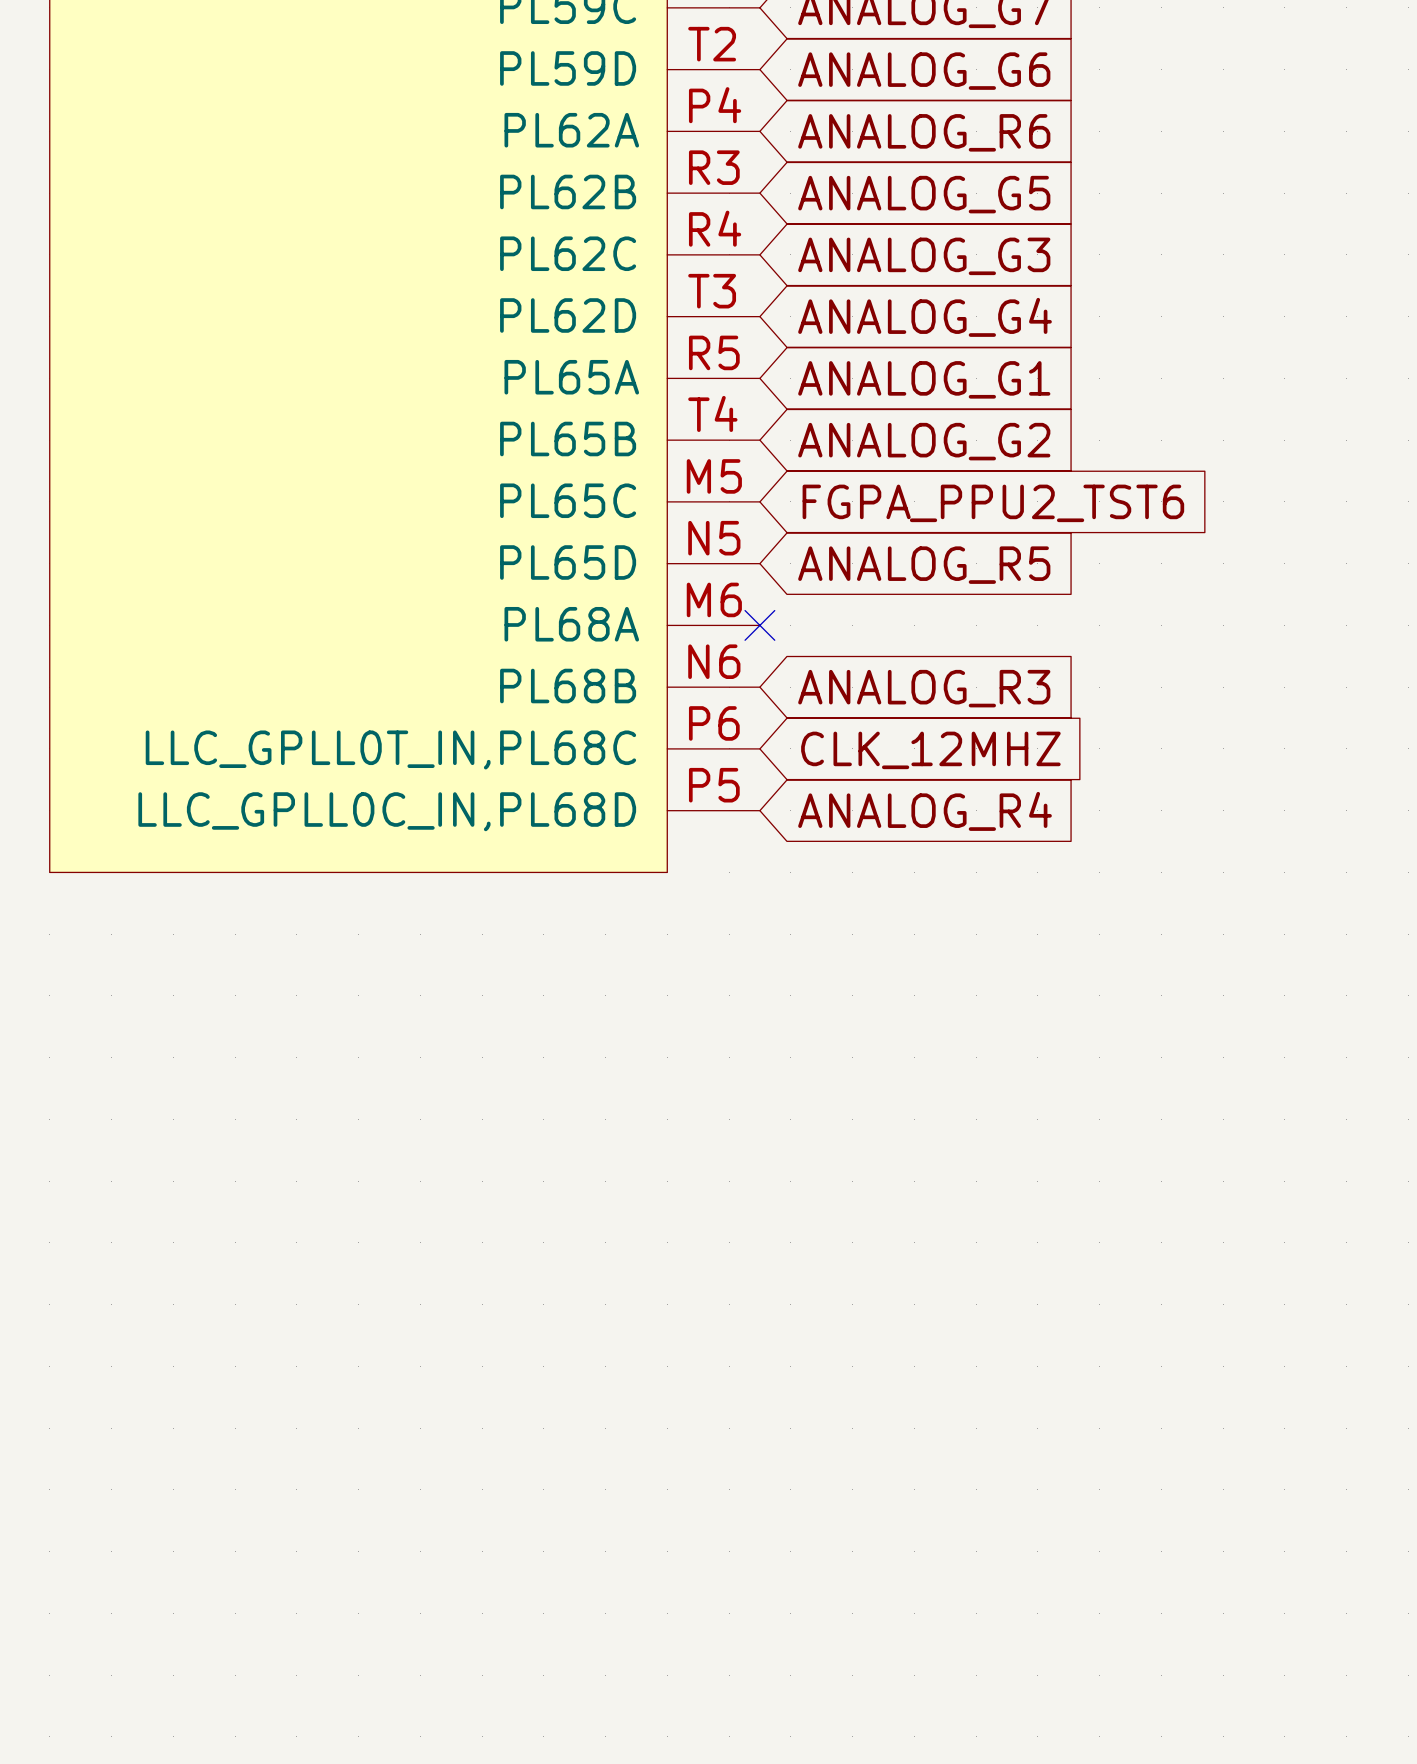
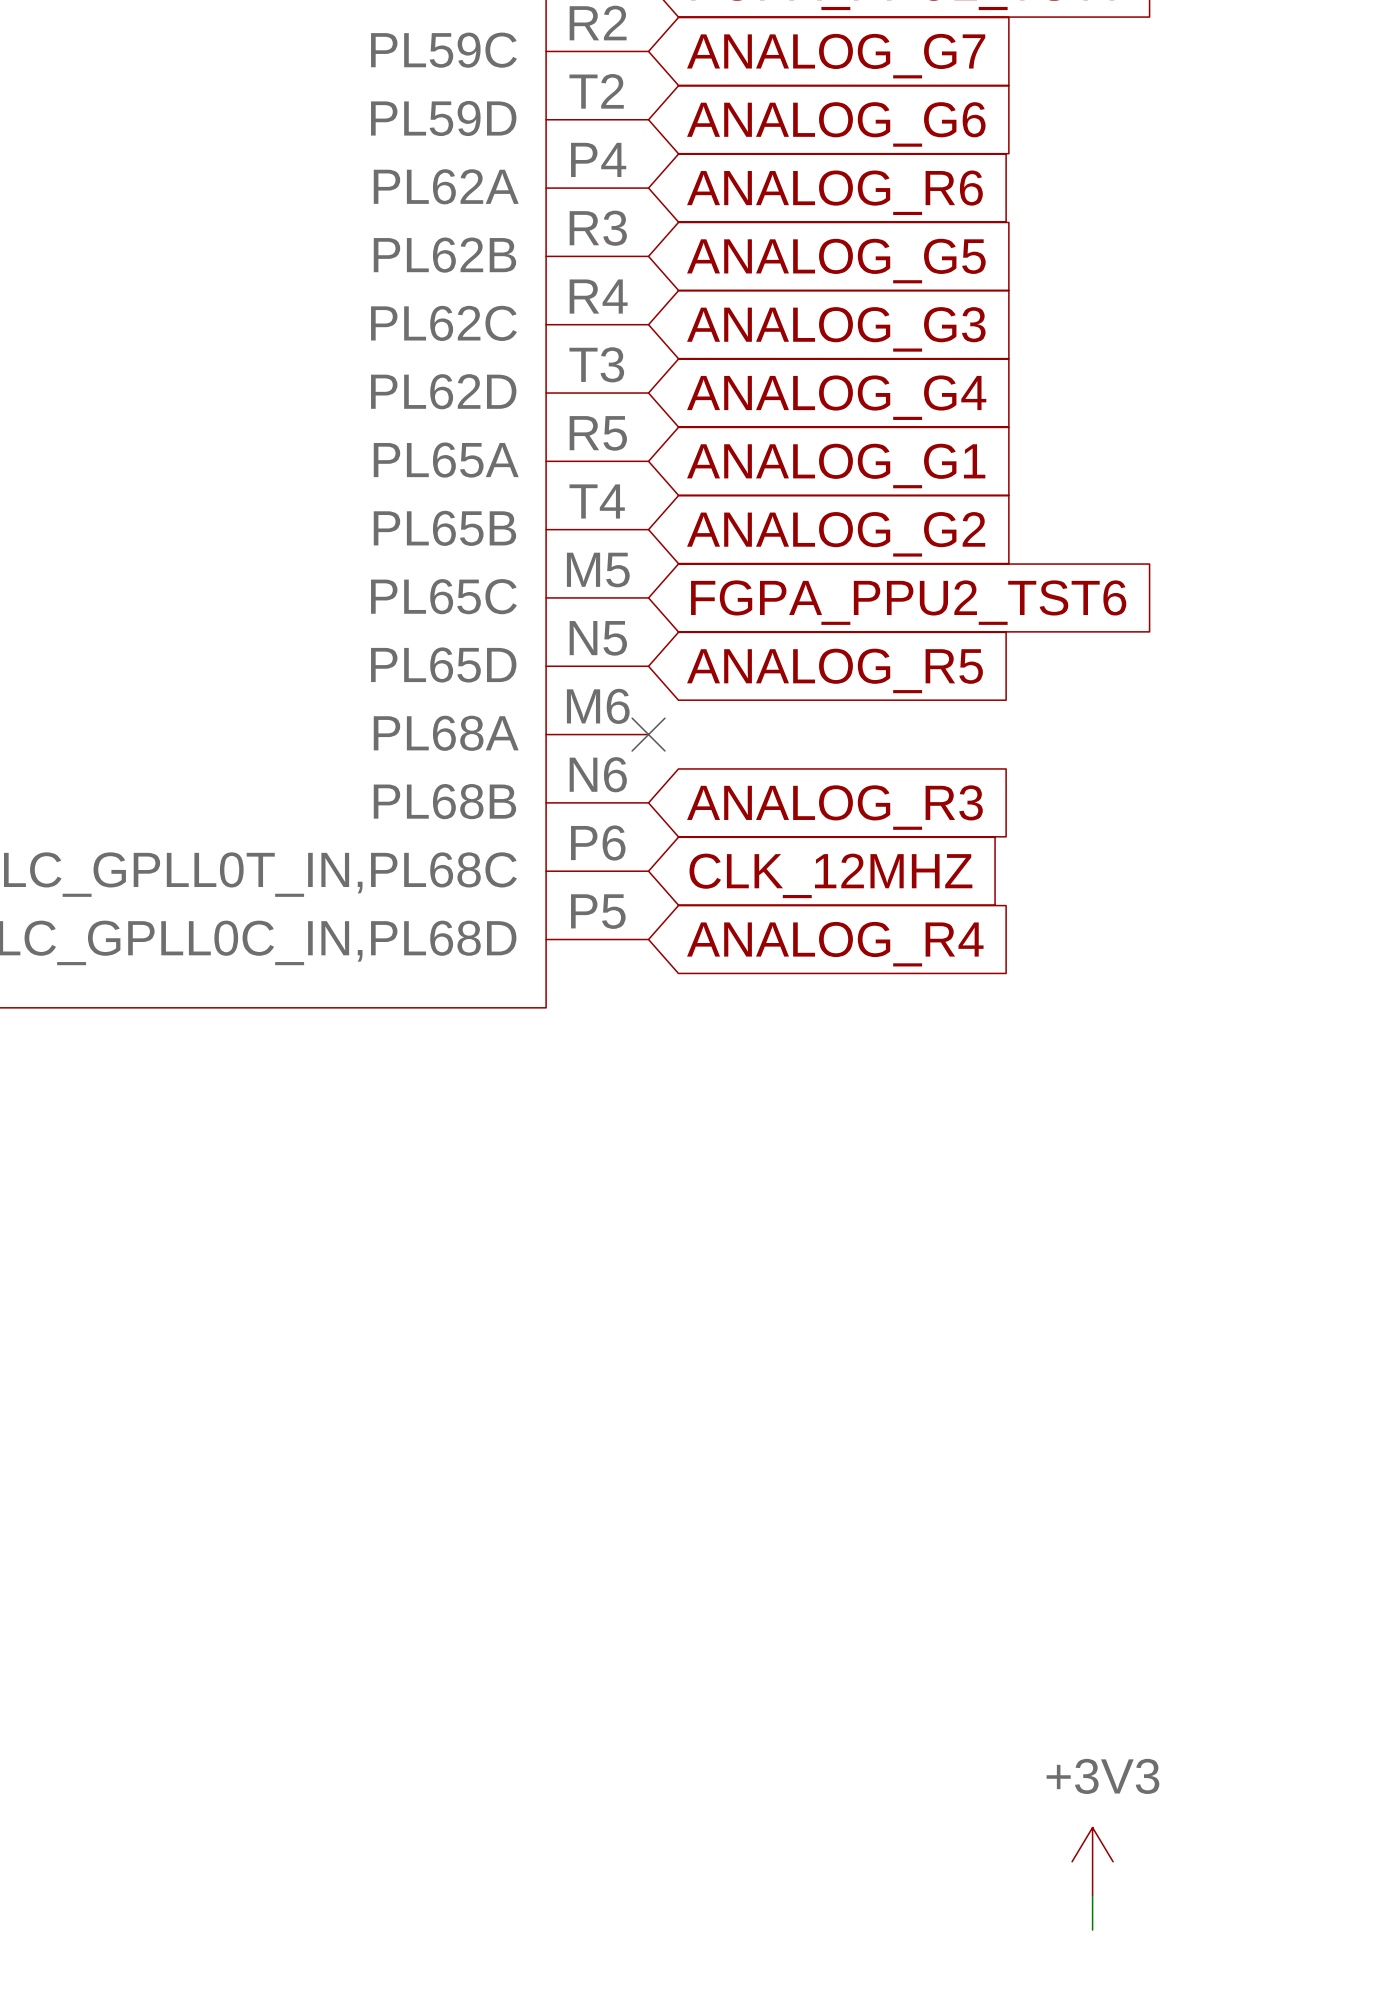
power symbol: none -> +3V3 (1092, 1861)
wire: none -> (1092, 1895) (1092, 1930)

